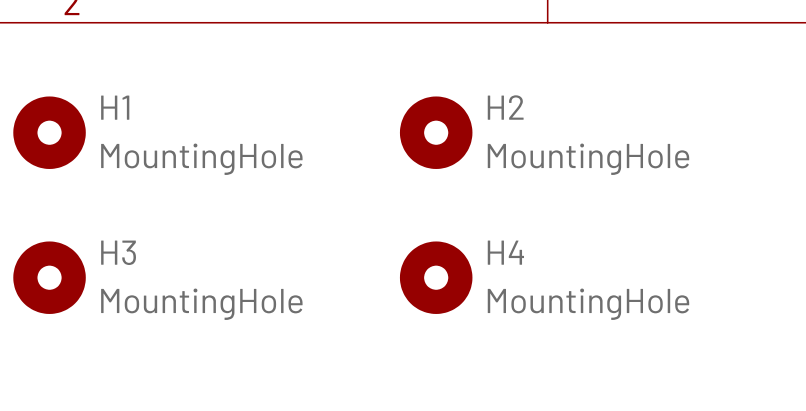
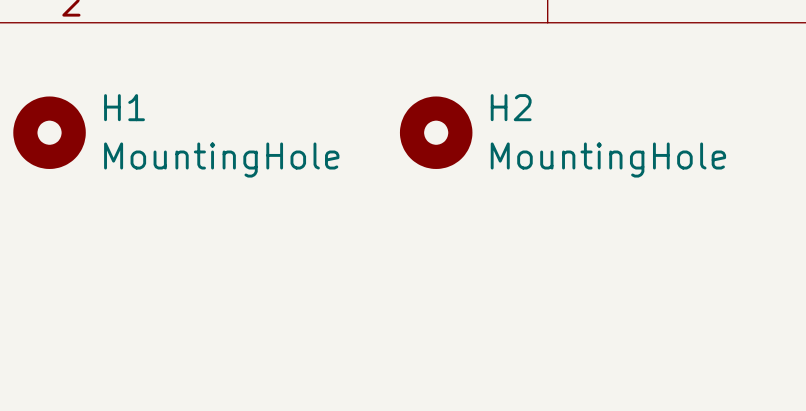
H3: MountingHole (49, 277) -> none
H4: MountingHole (436, 277) -> none

